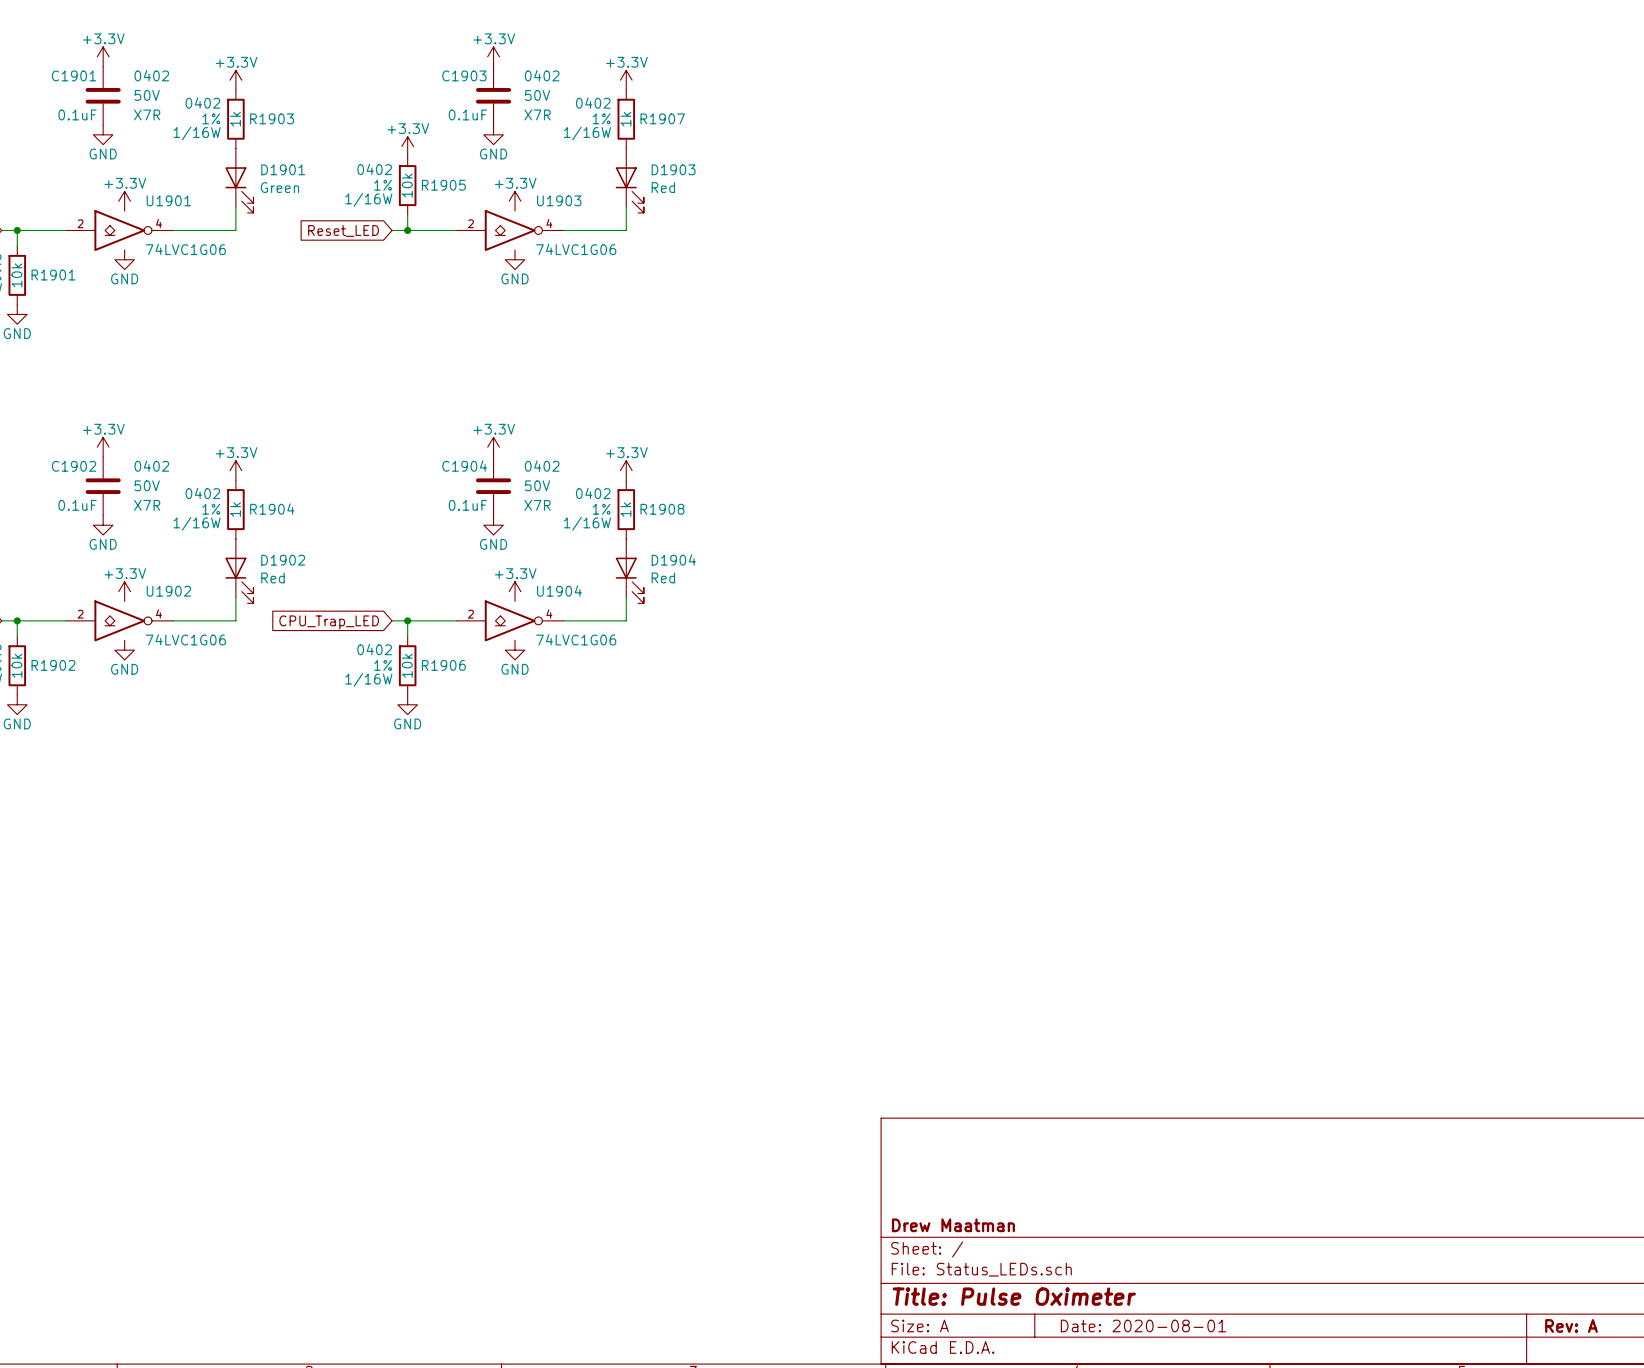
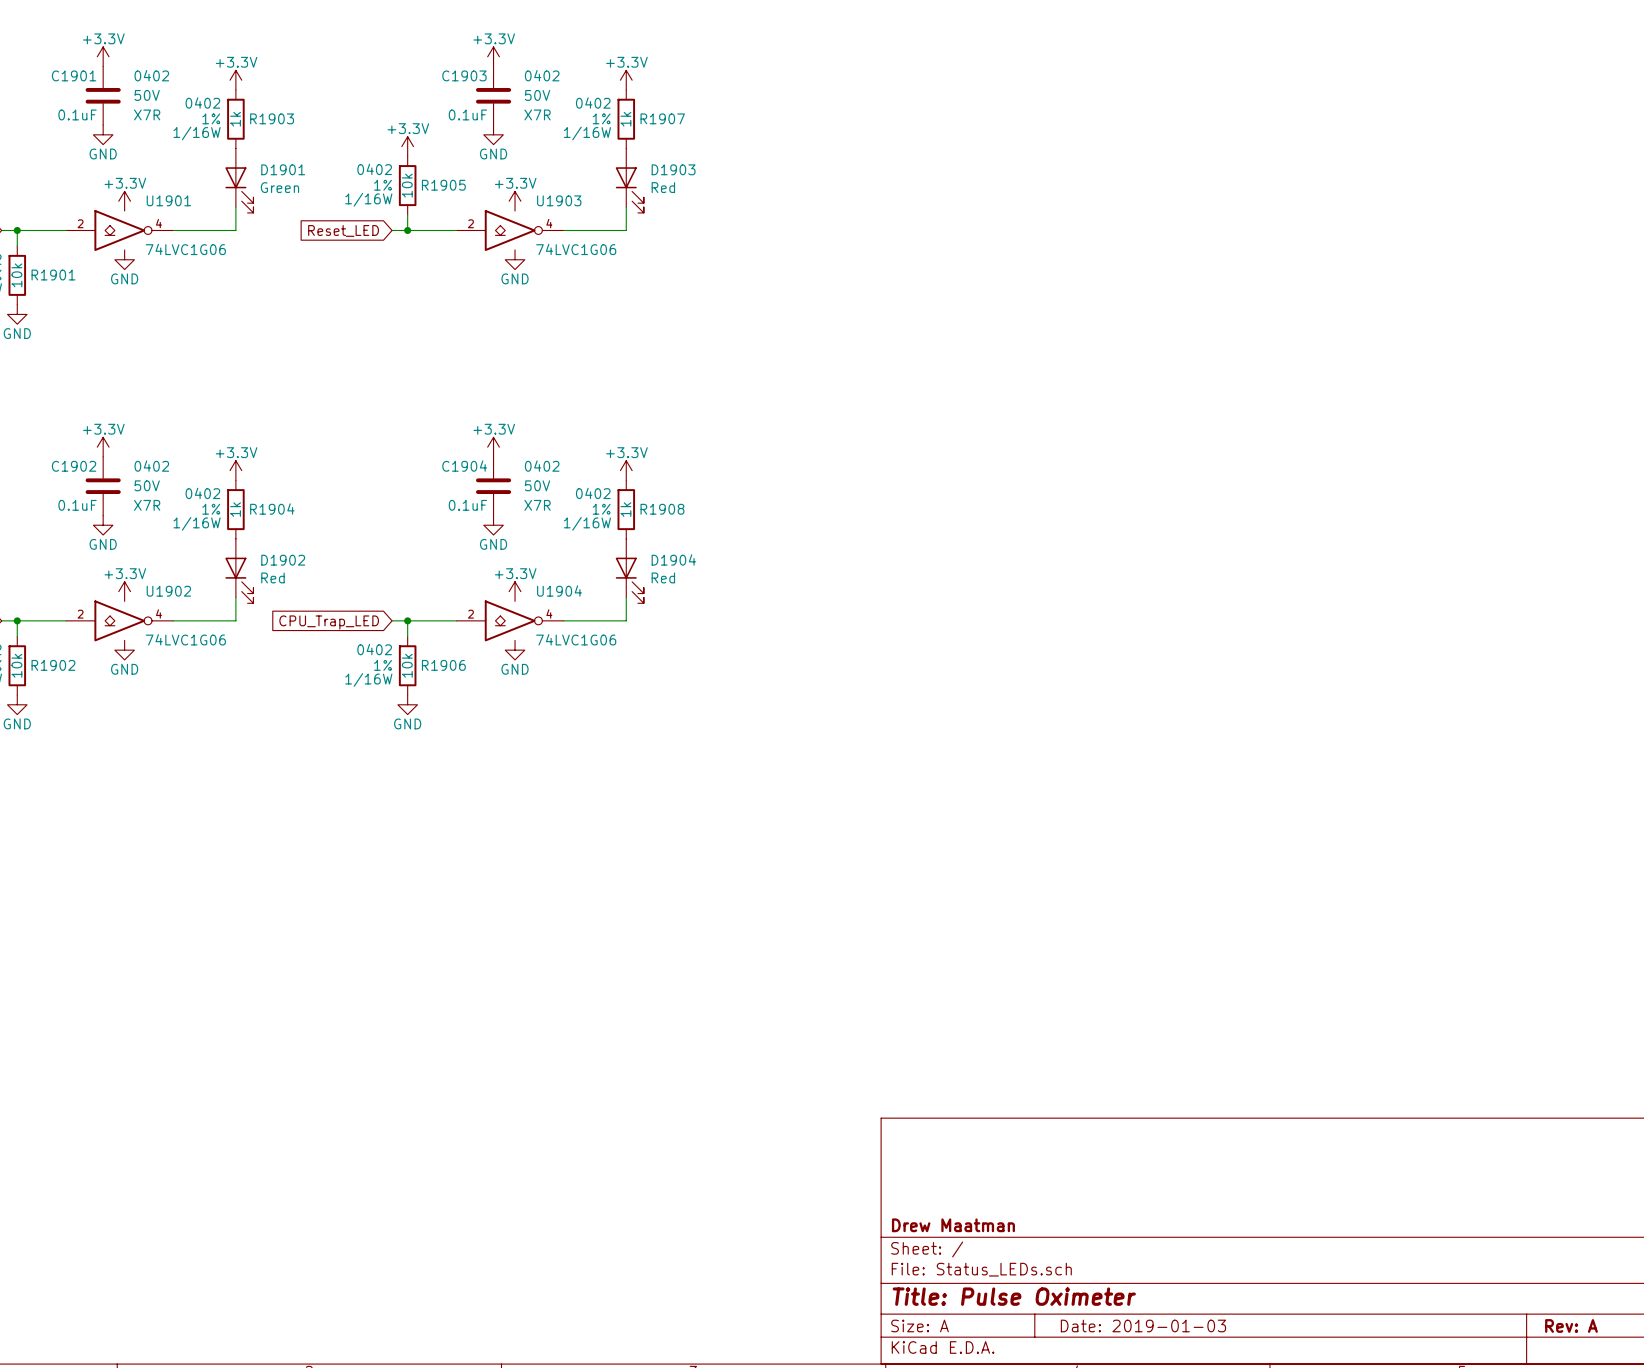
title block: Date: 2020-08-01 (1143, 1325) -> Date: 2019-01-03 (1143, 1325)

